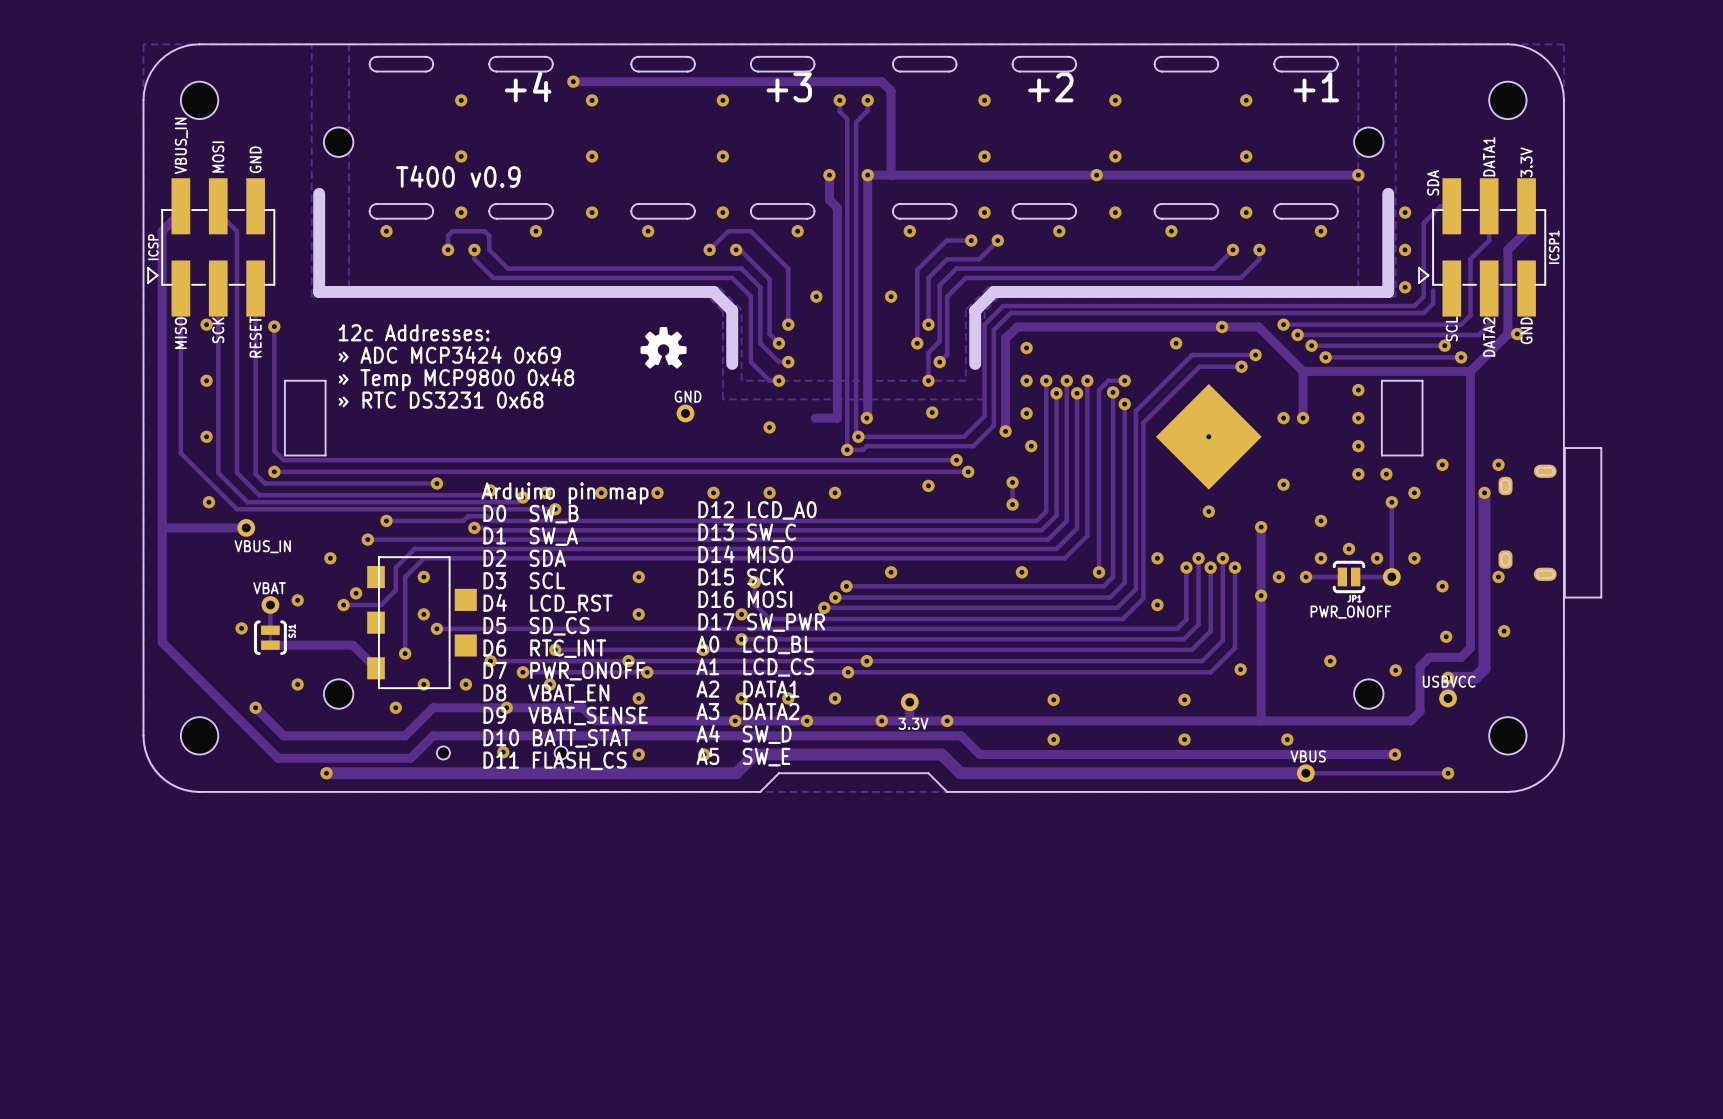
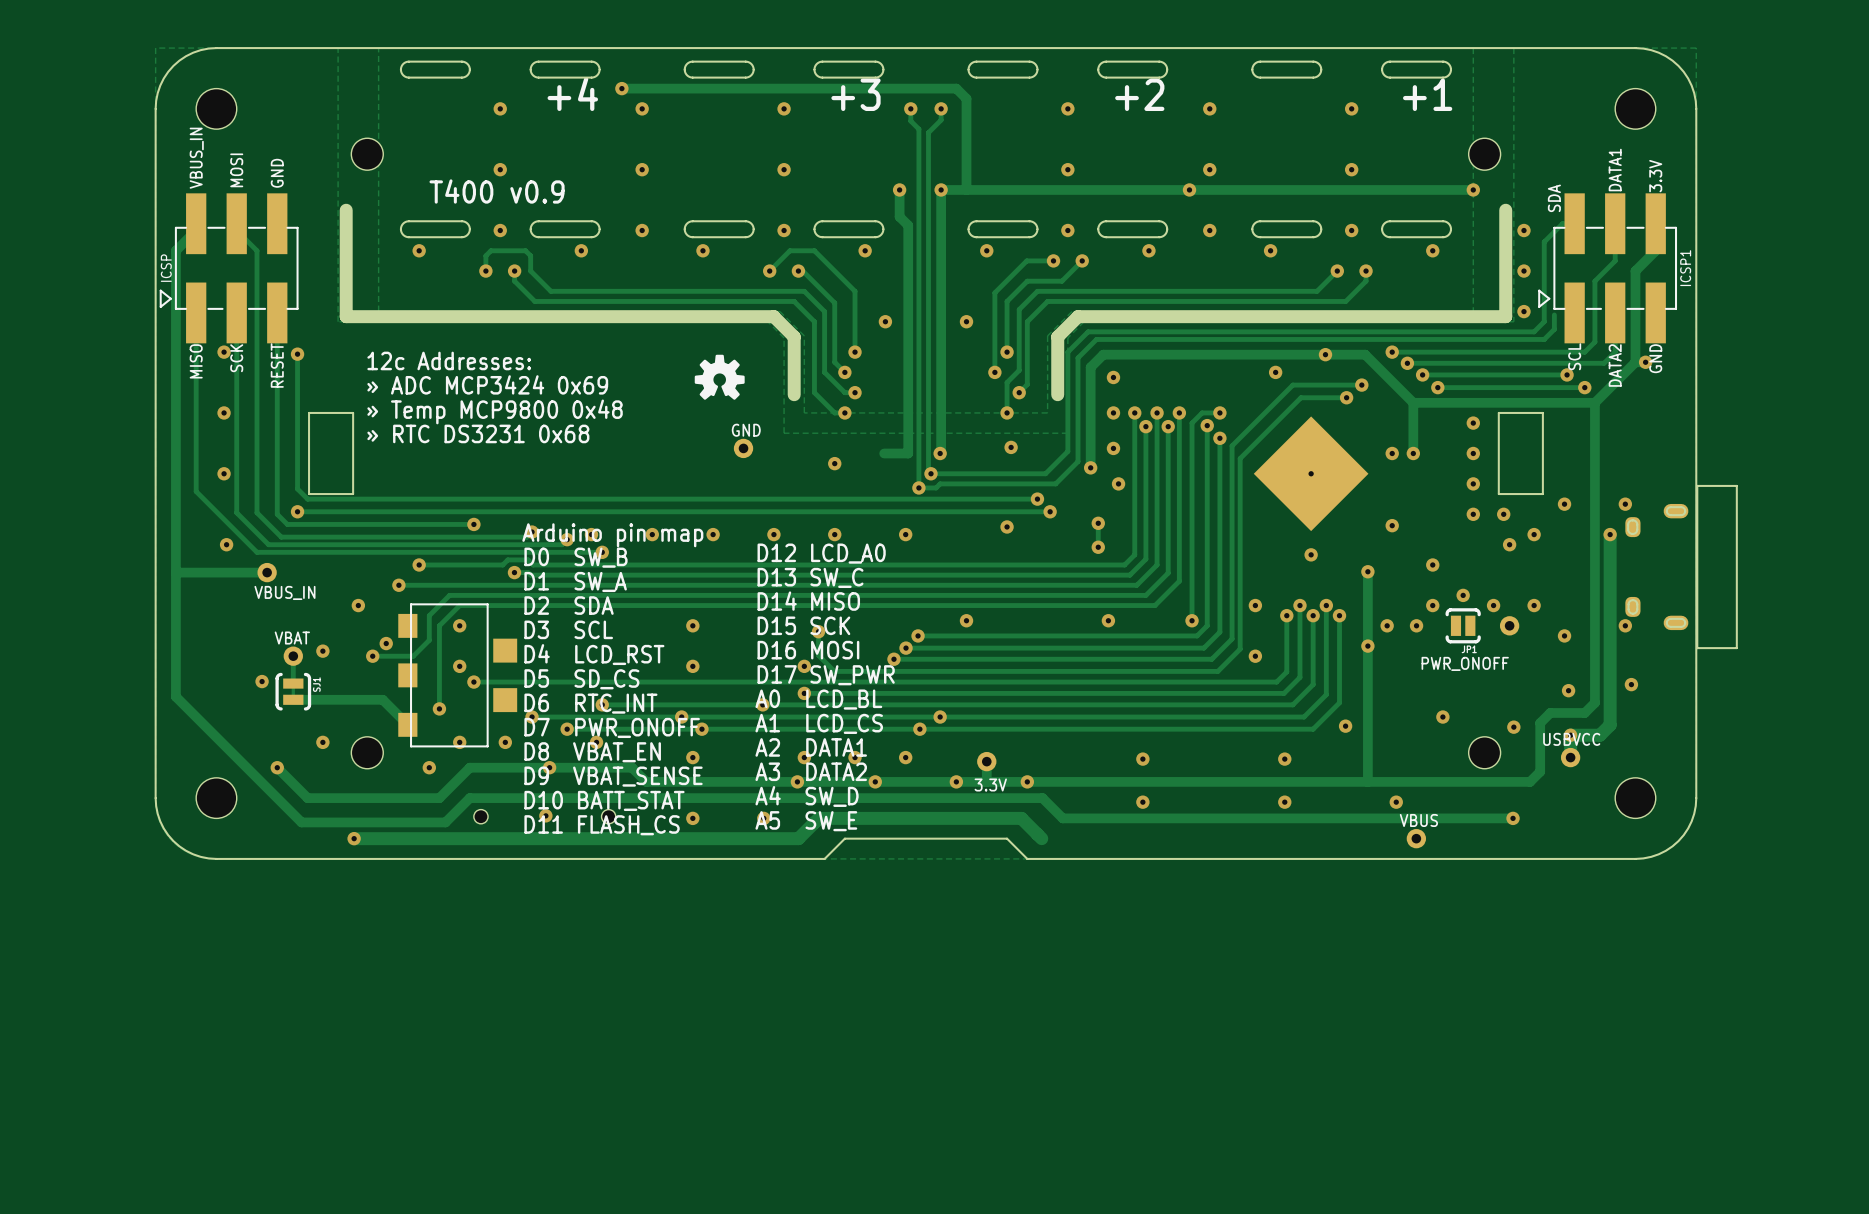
track: (1391, 502) (1391, 576) (1355, 576) -> none
track: (1342, 576) (1306, 576) -> none
track: (1448, 773) (960, 773) -> none
via: (1448, 773) -> none

